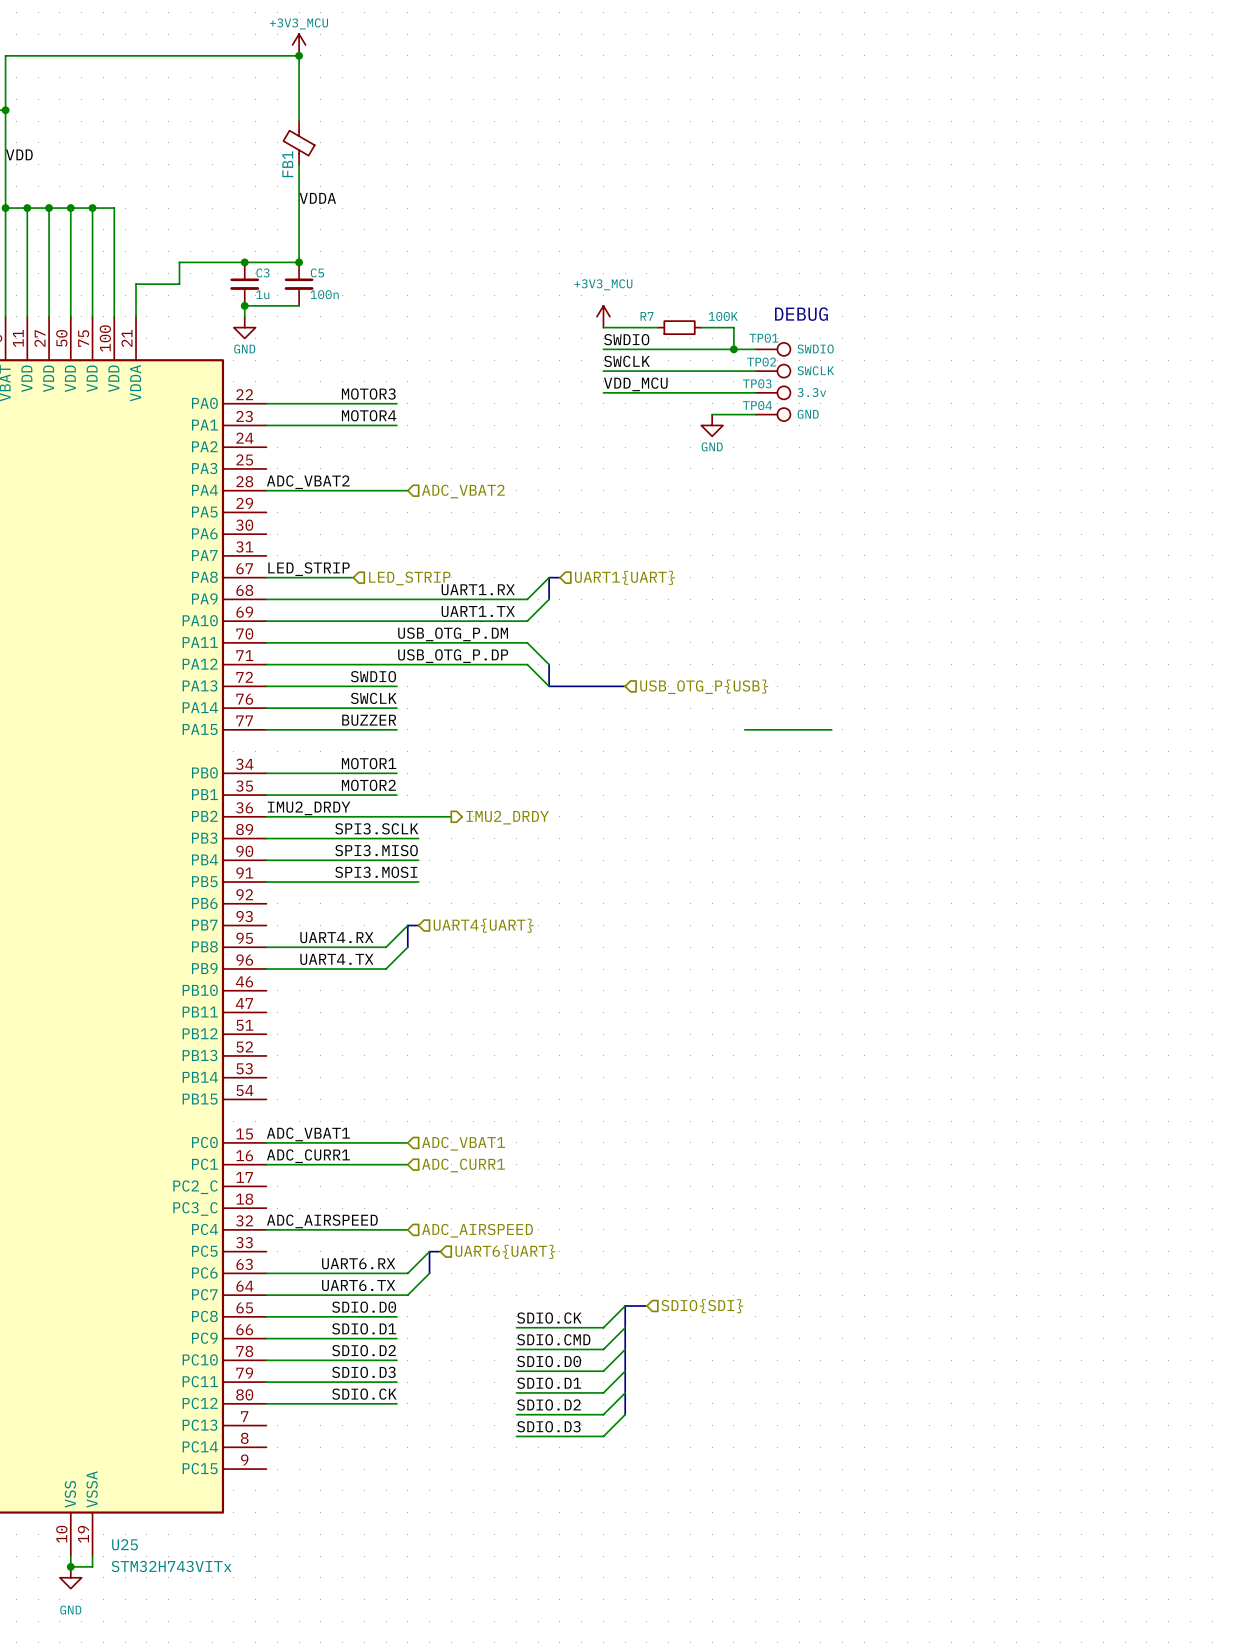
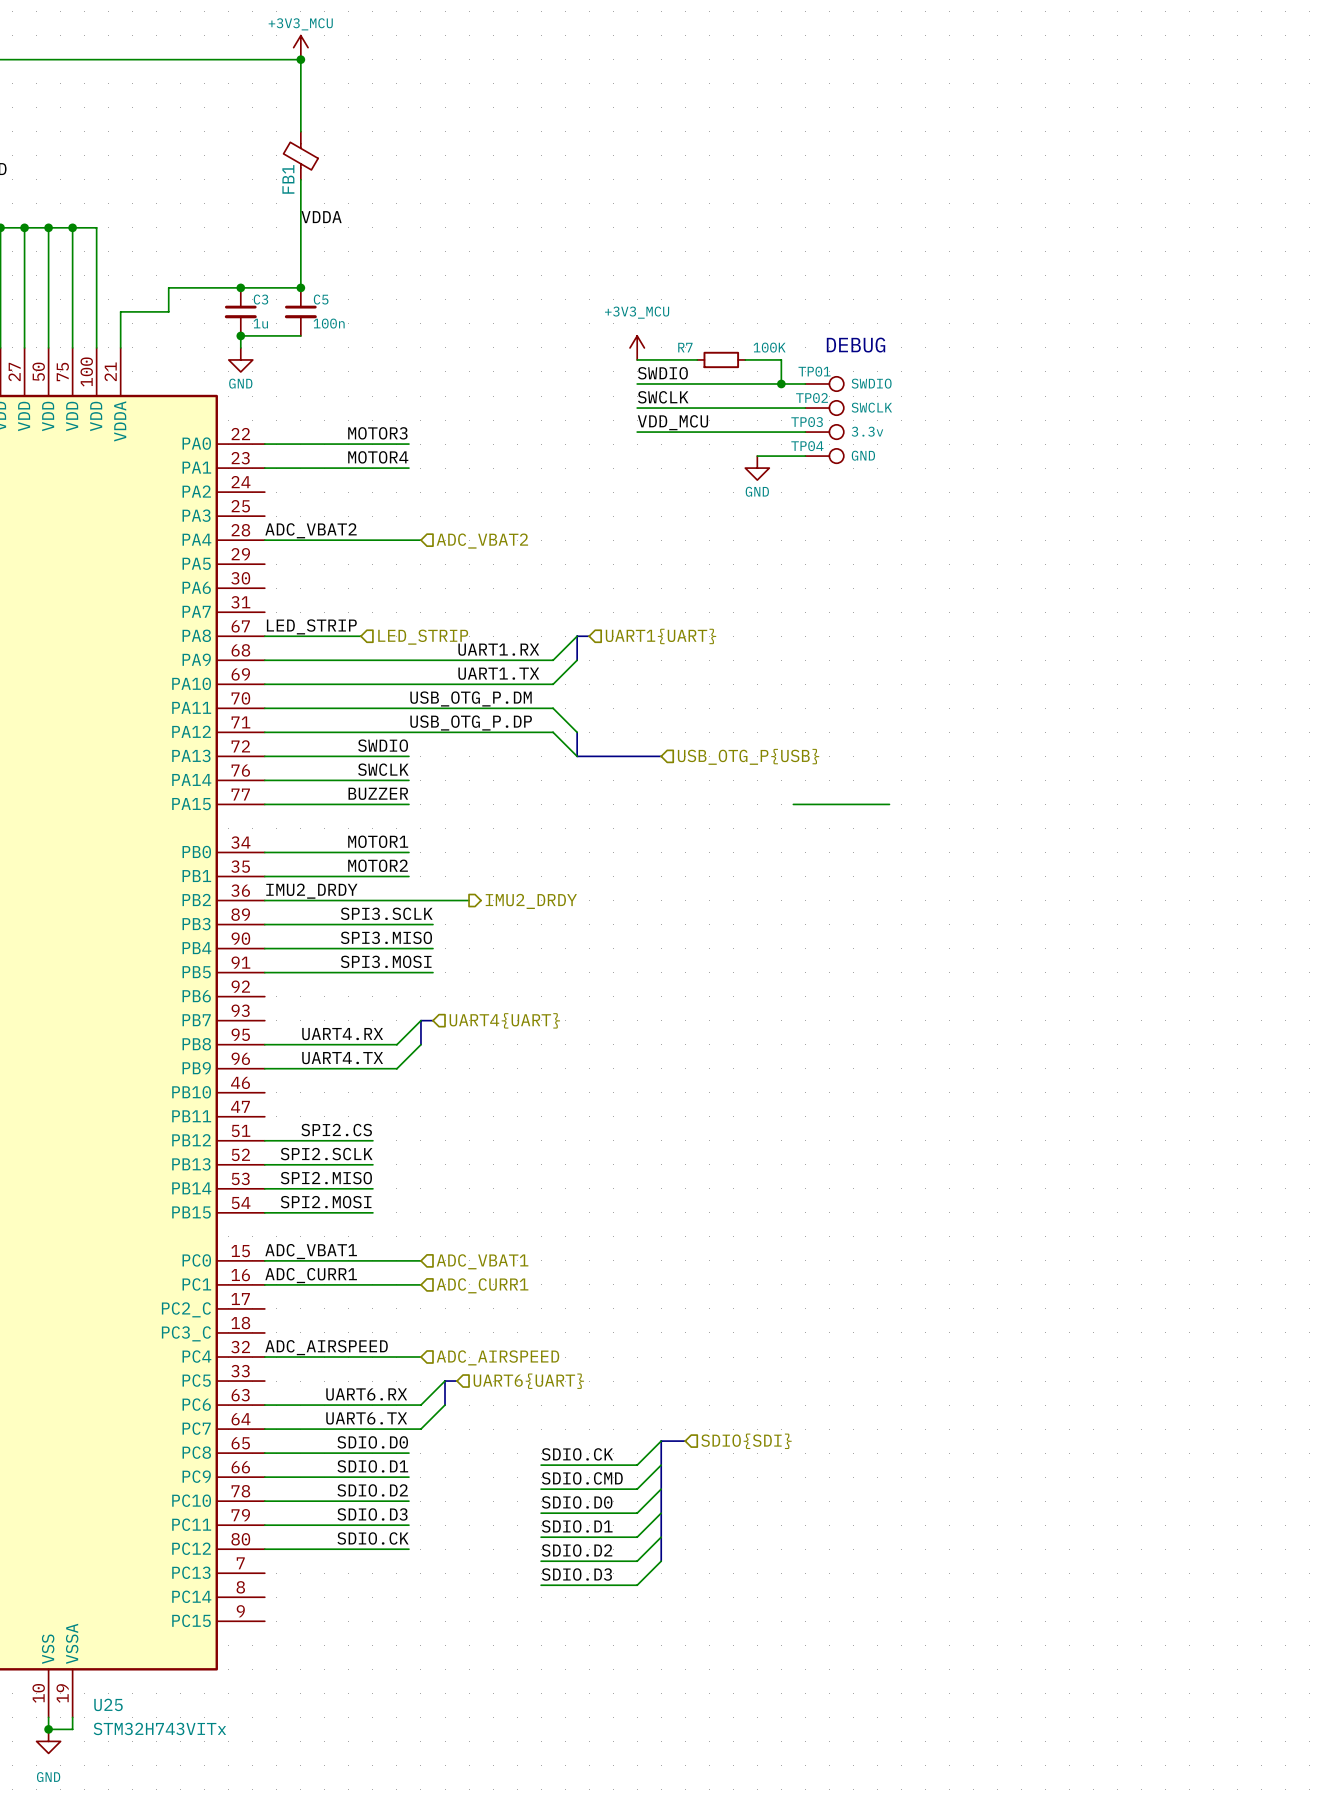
label: none -> SPI2.CS (336, 1130)
wire: none -> (264, 1140) (372, 1140)
label: none -> SPI2.SCLK (326, 1154)
wire: none -> (264, 1164) (372, 1164)
label: none -> SPI2.MISO (326, 1178)
wire: none -> (264, 1188) (372, 1188)
label: none -> SPI2.MOSI (326, 1202)
wire: none -> (264, 1212) (372, 1212)

